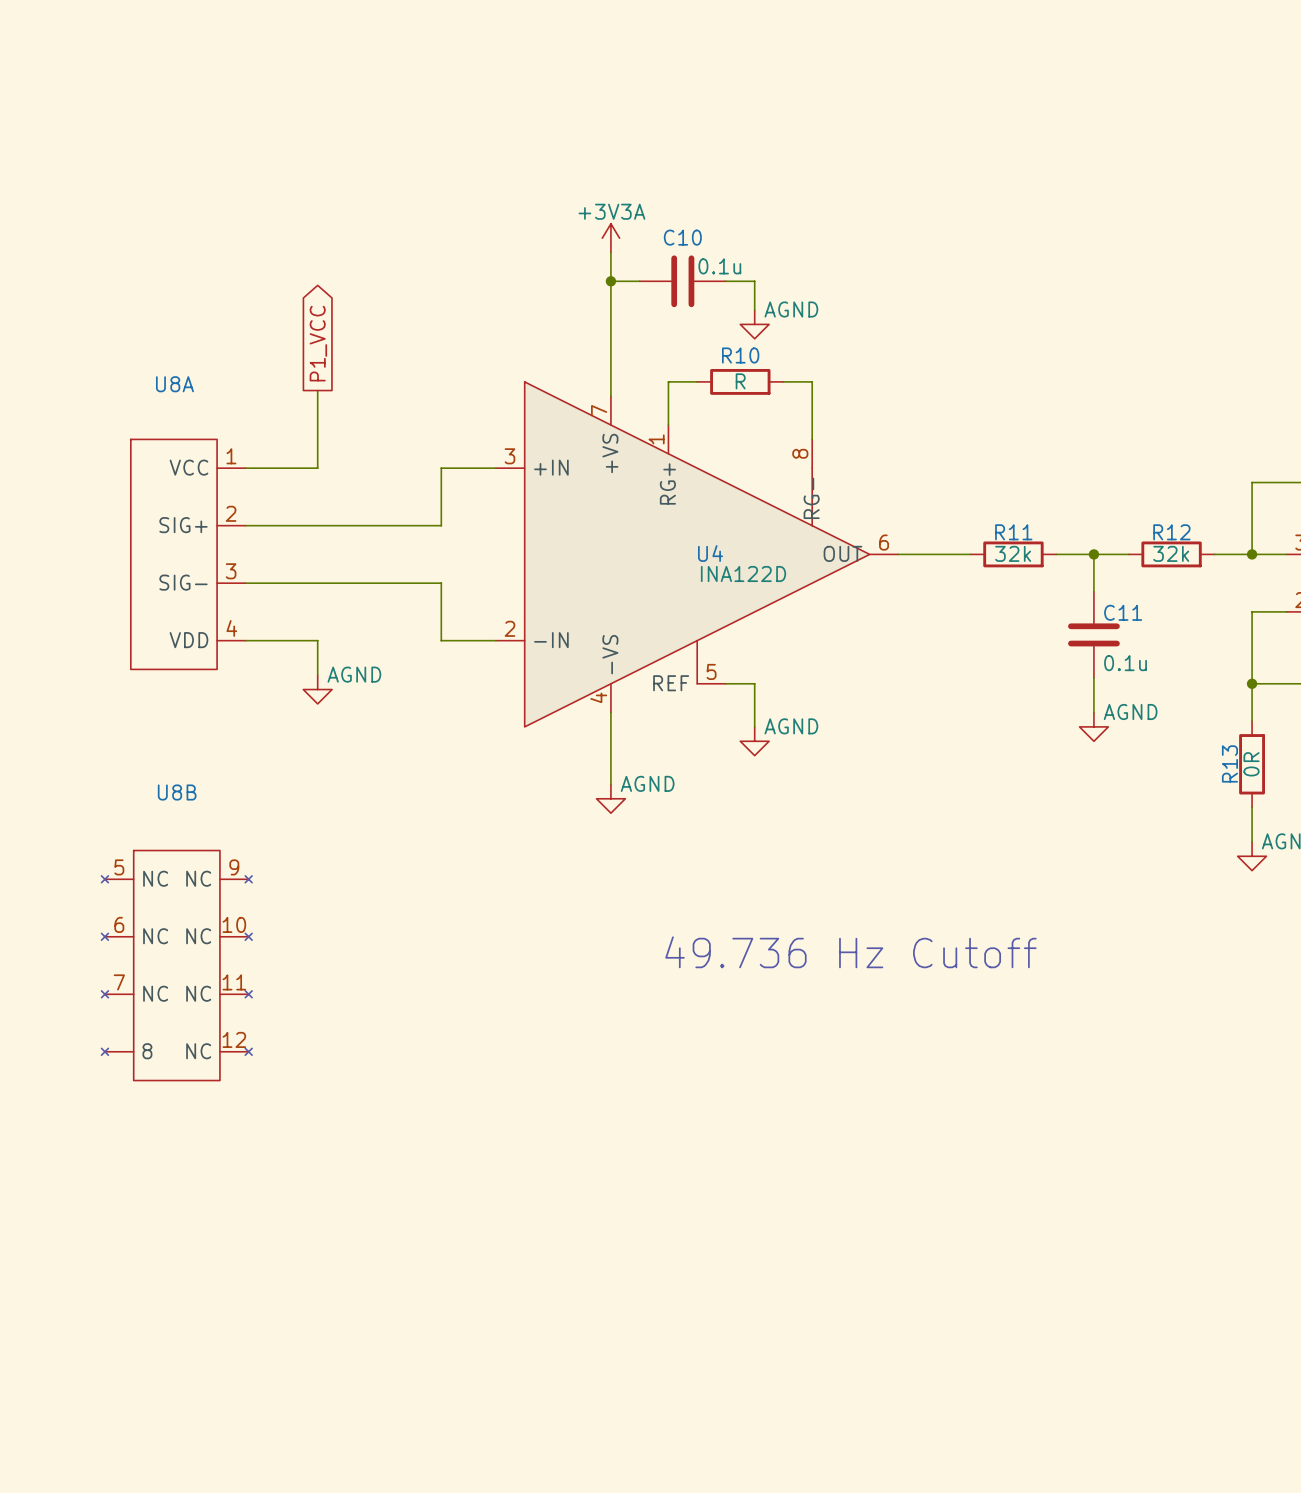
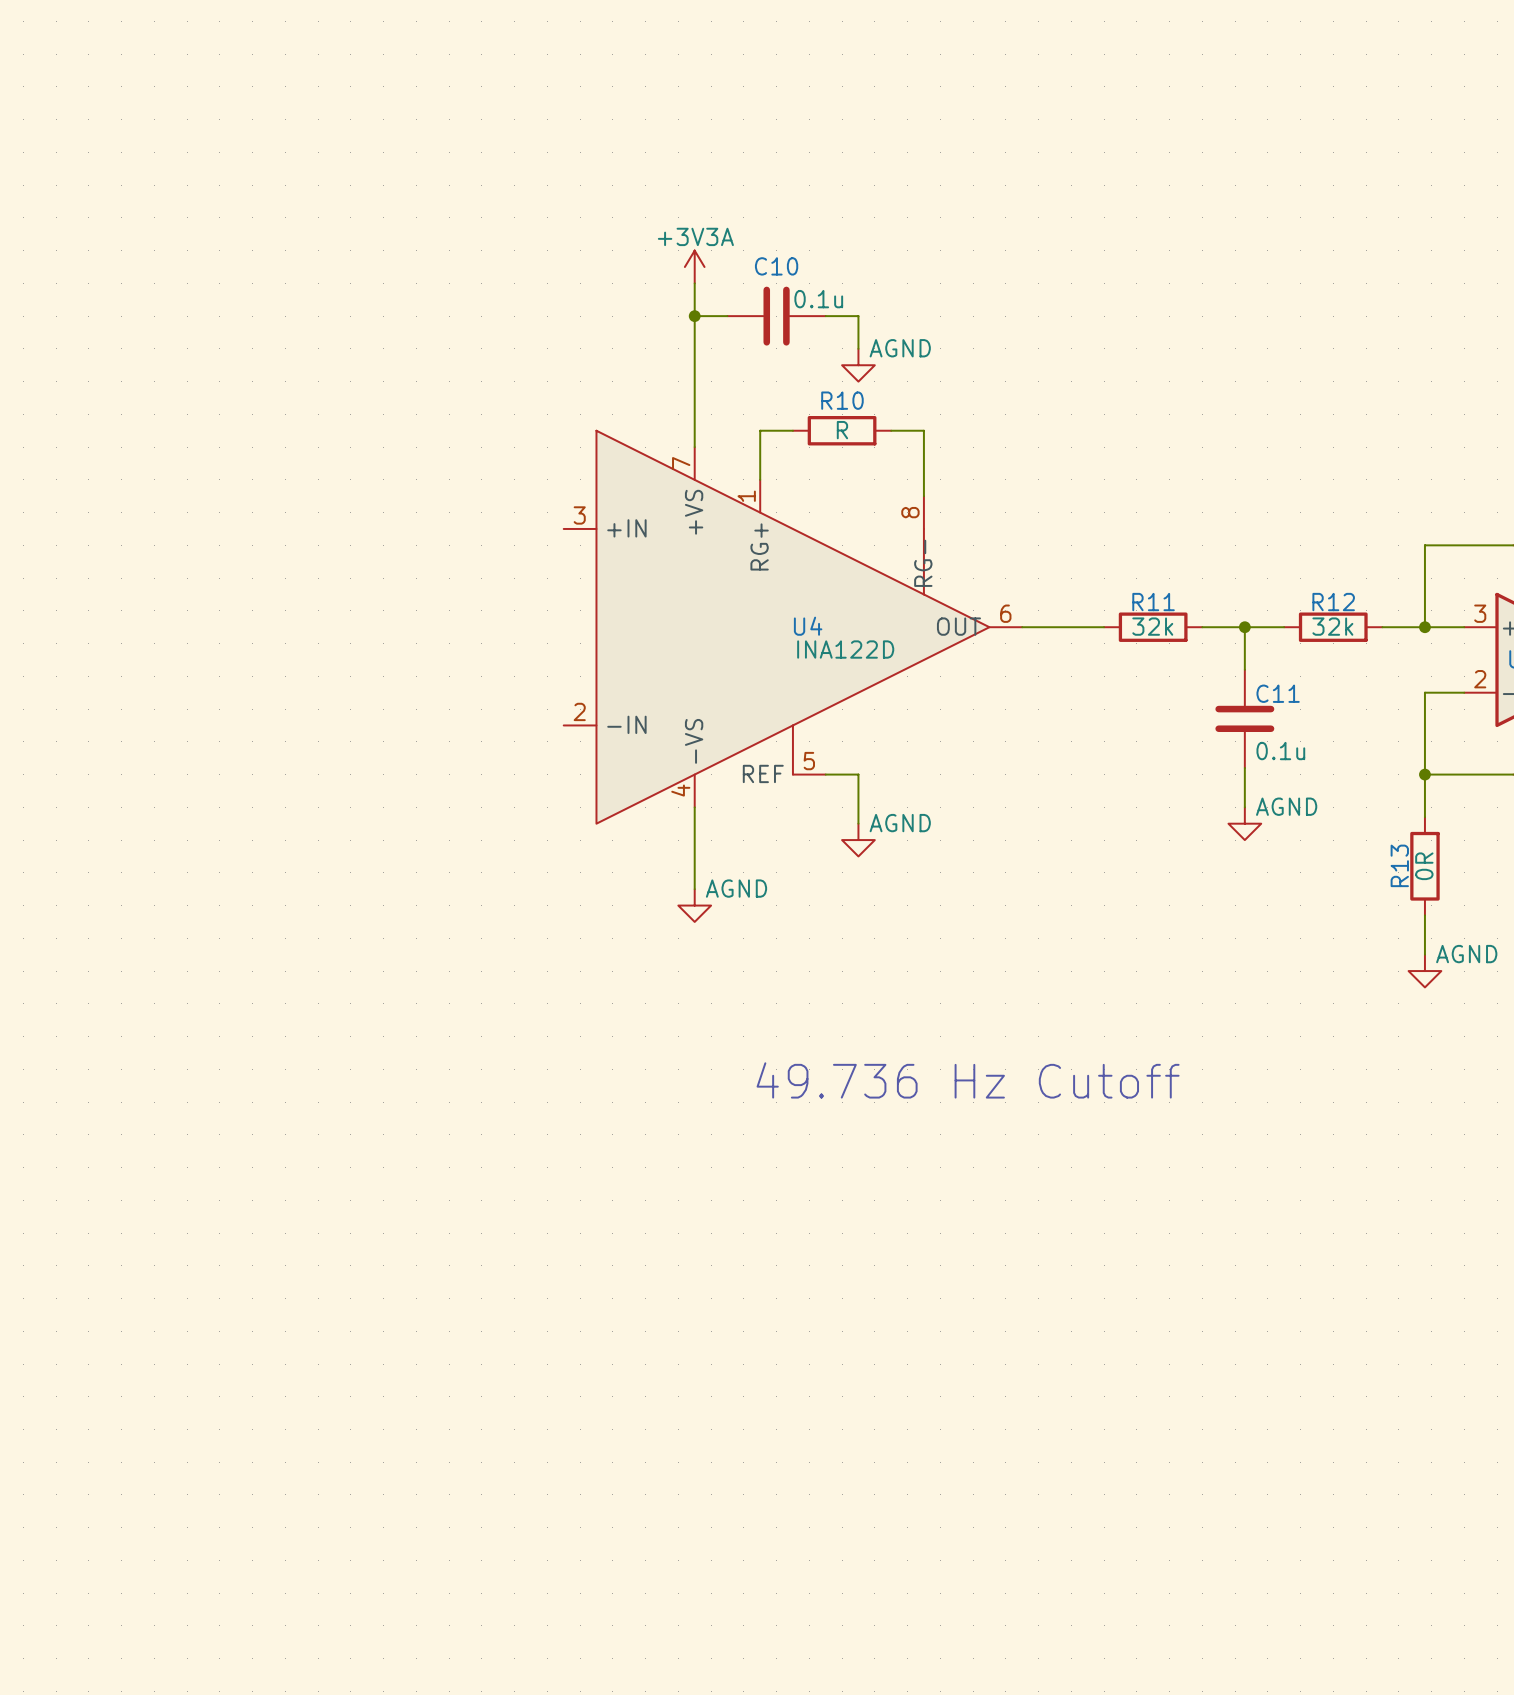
global label: P1_VCC (318, 343) -> none
wire: (317, 390) (317, 468) (245, 468) -> none
wire: (495, 468) (441, 468) (441, 525) (245, 525) -> none
U8A: (188, 554) -> none
wire: (245, 583) (441, 583) (441, 640) (495, 640) -> none
wire: (245, 640) (317, 640) (317, 675) -> none
power symbol: AGND (317, 689) -> none
U8B: (176, 965) -> none

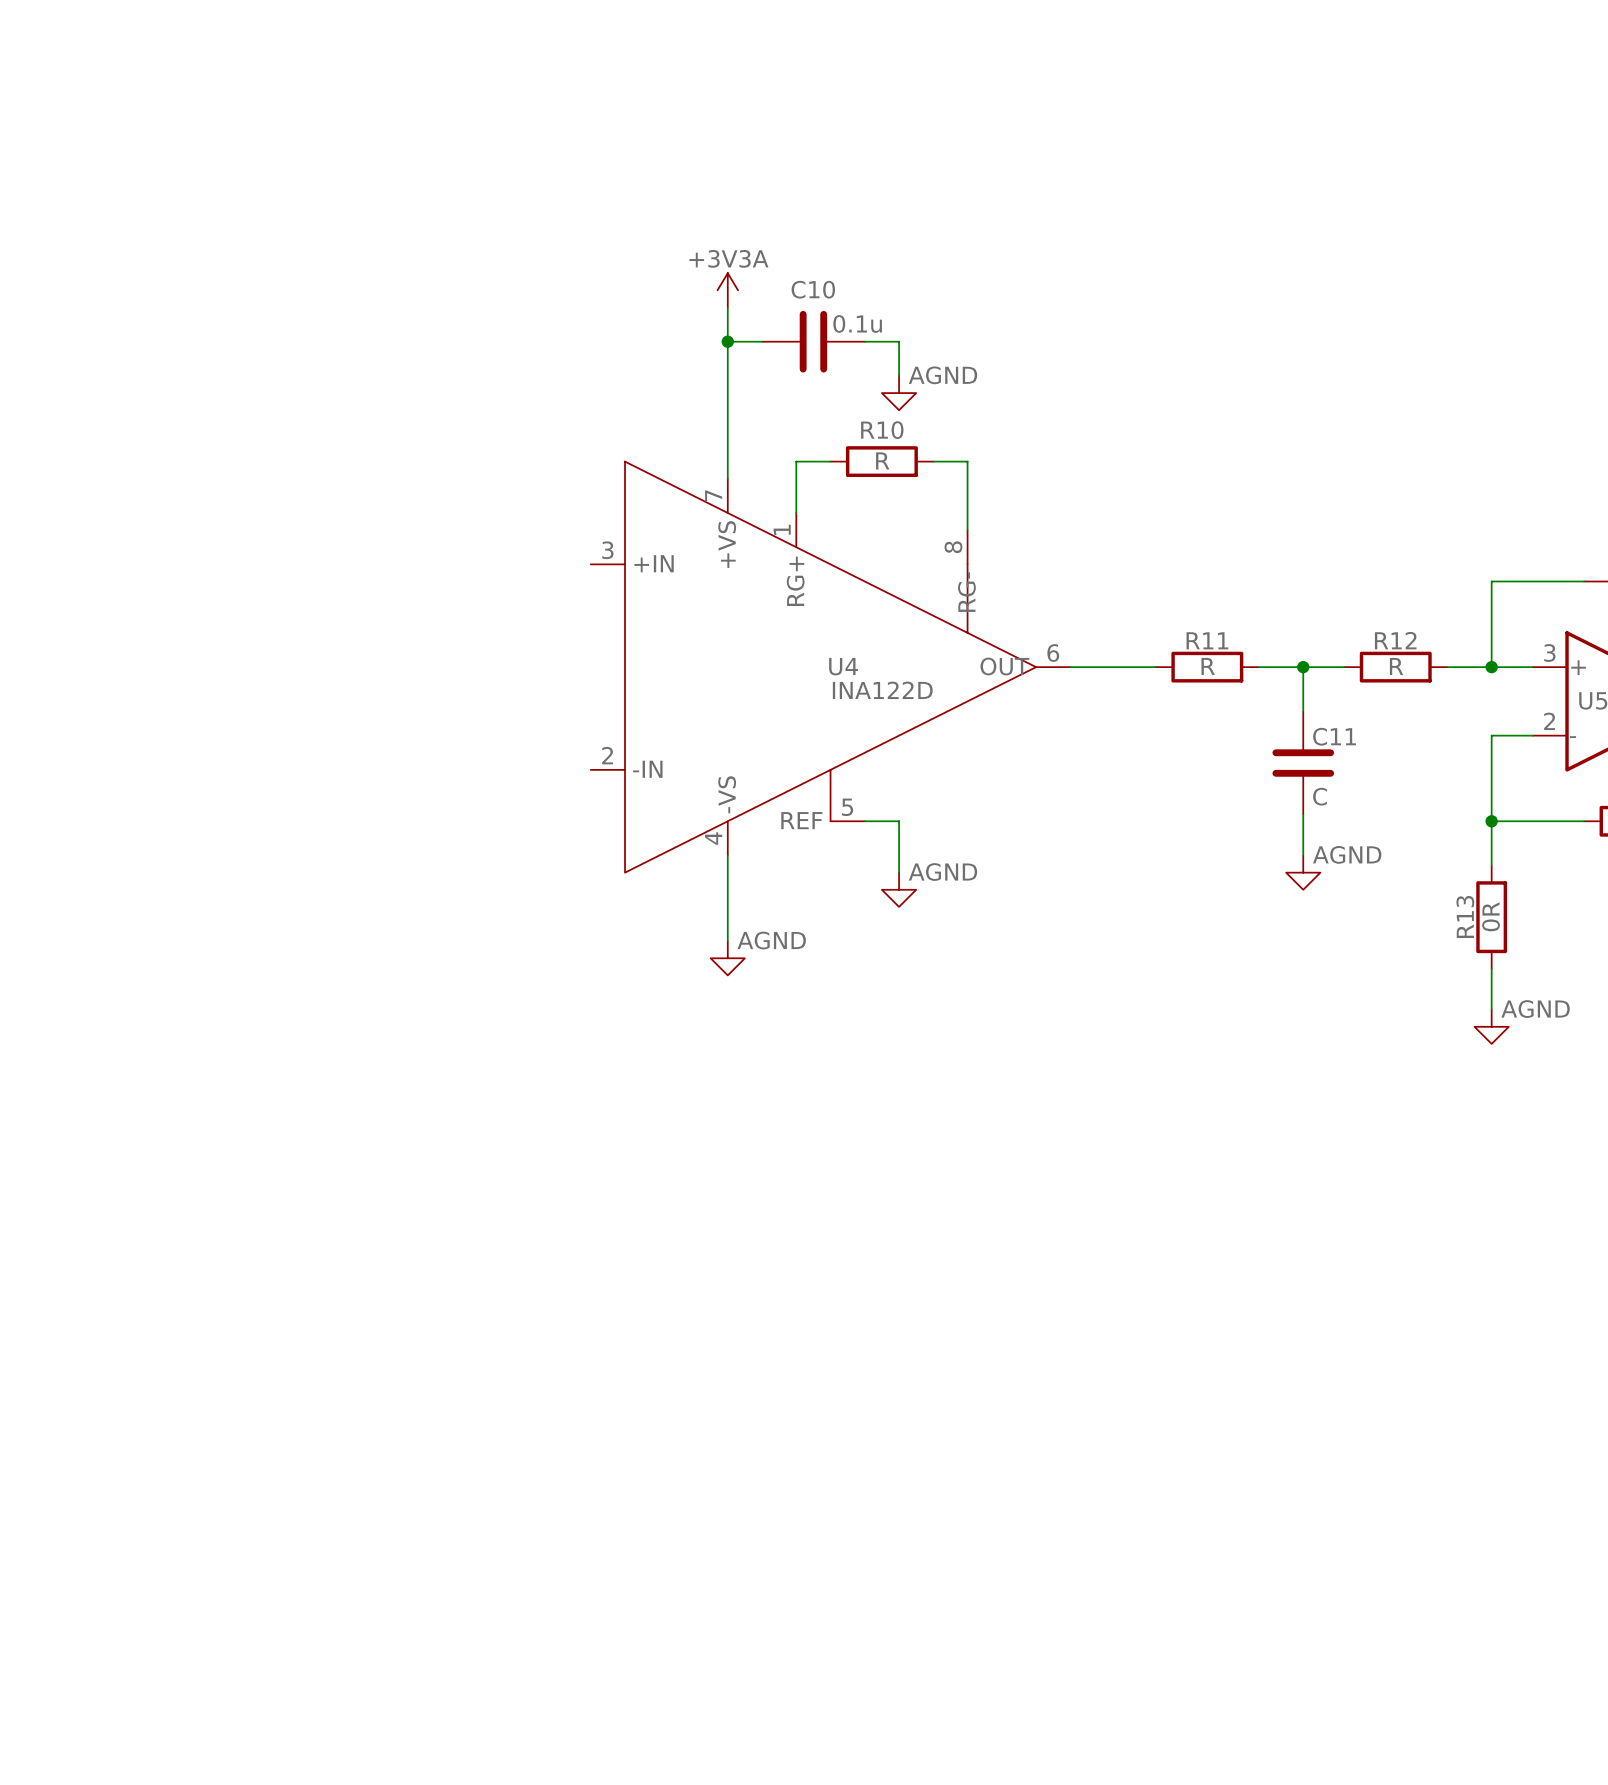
R11 value: 32k (1152, 626) -> R (1208, 666)
R12 value: 32k (1332, 626) -> R (1396, 666)
C11 value: 0.1u (1280, 751) -> C (1320, 796)
text: 49.736 Hz Cutoff (968, 1080) -> none

